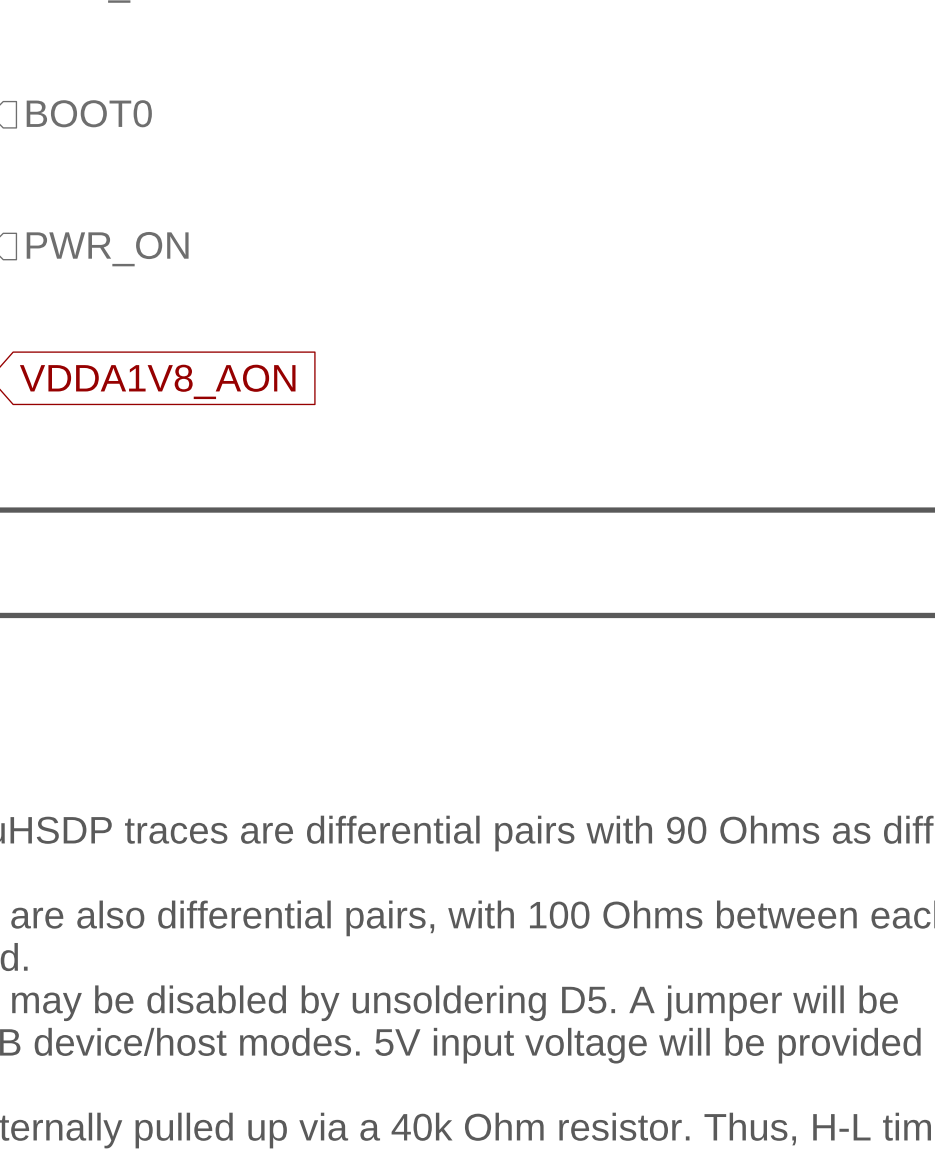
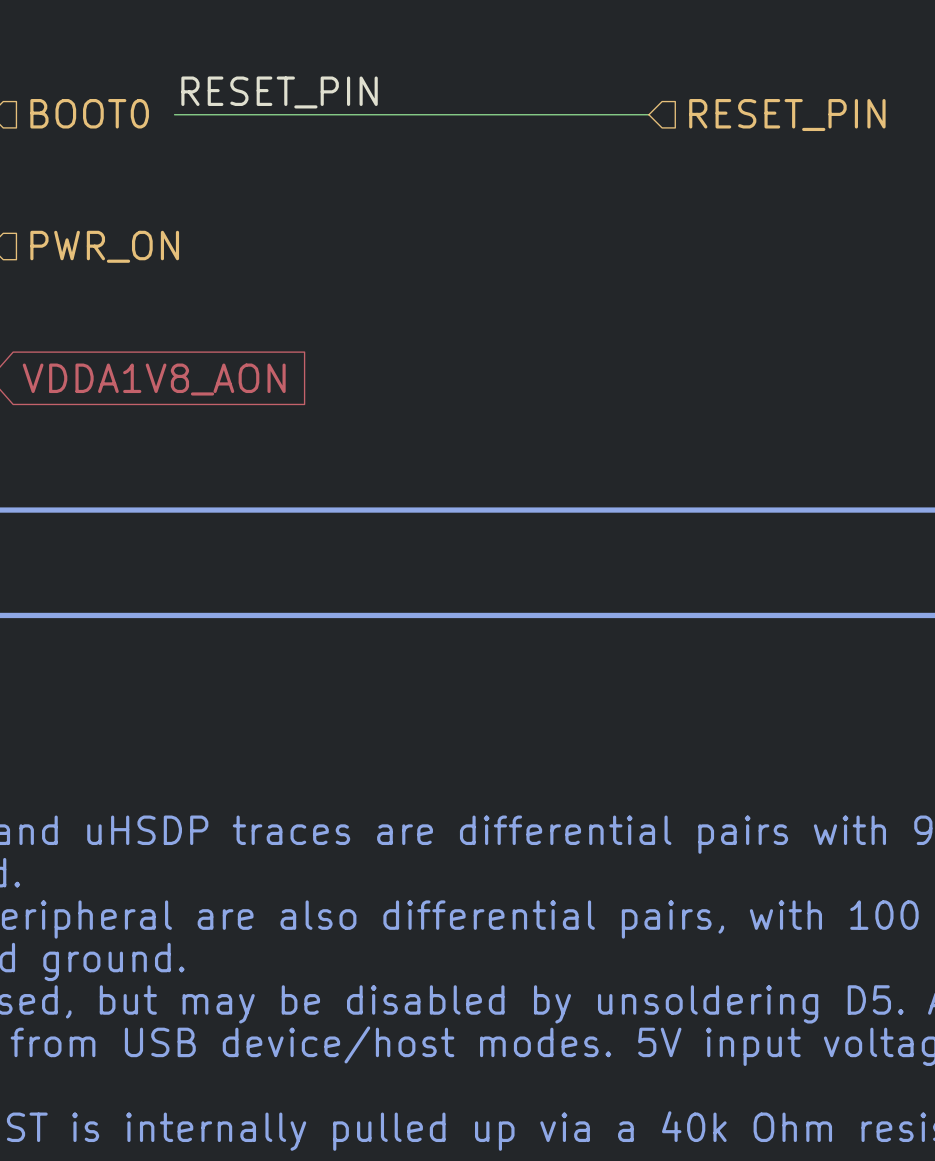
label: none -> RESET_PIN (279, 92)
wire: none -> (174, 114) (648, 114)
hierarchical label: none -> RESET_PIN (787, 115)

